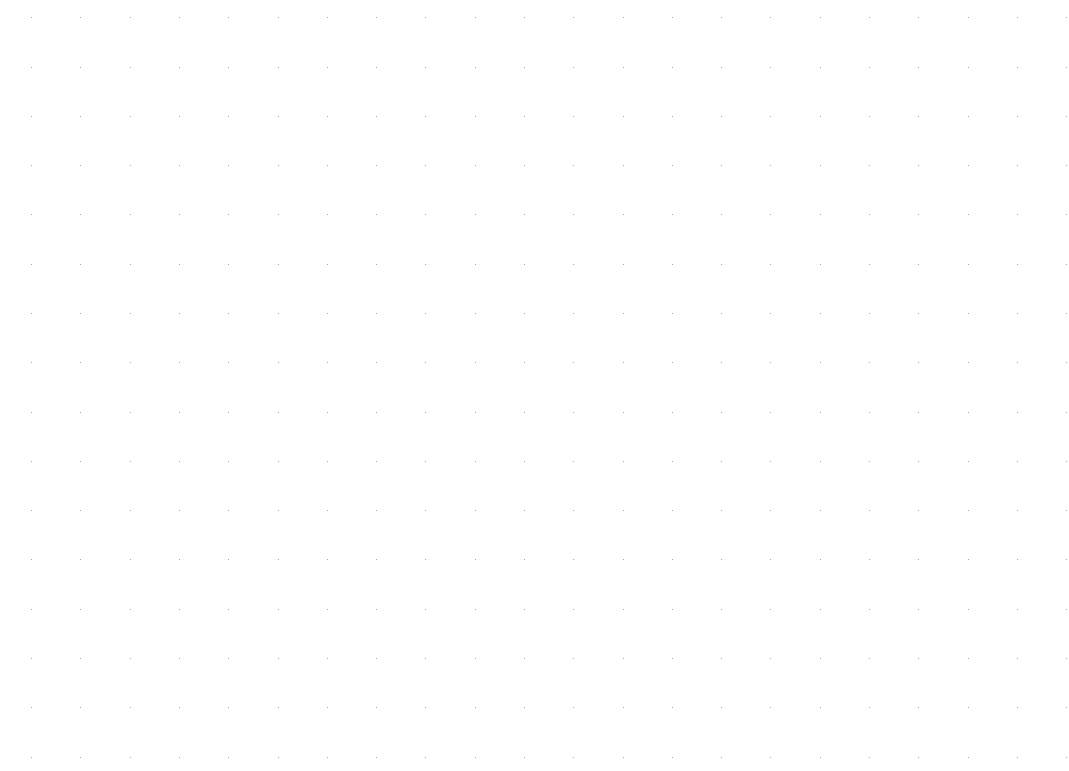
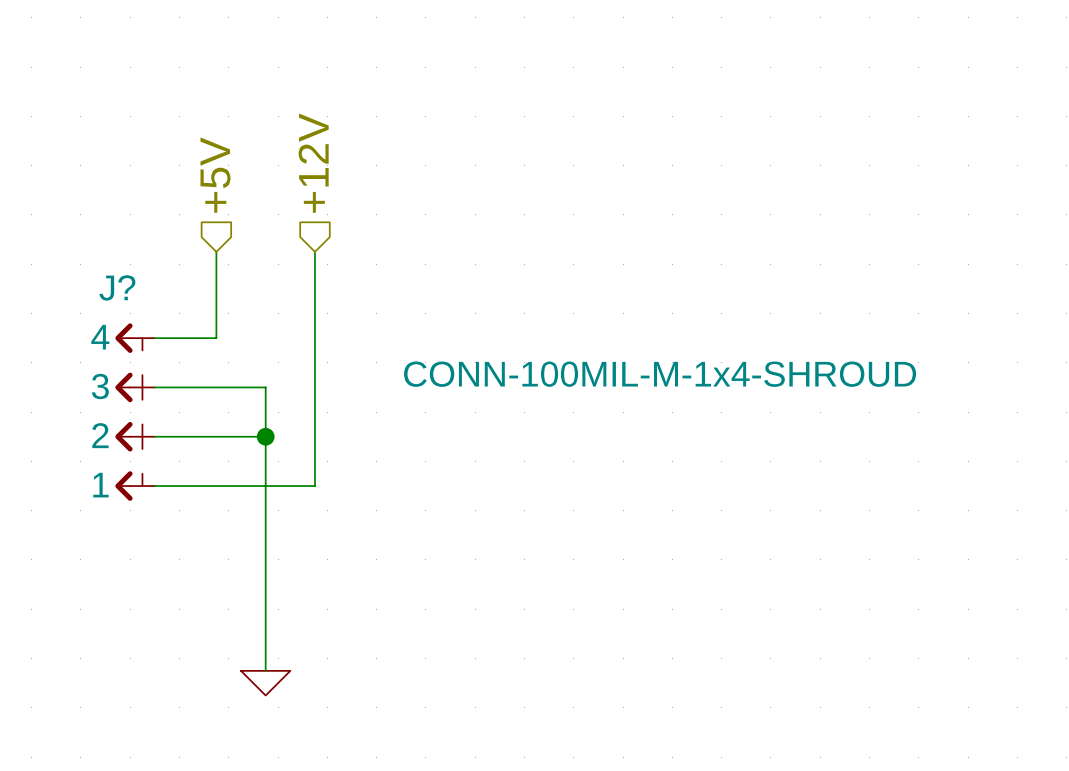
hierarchical label: none -> +12V (313, 163)
hierarchical label: none -> +5V (215, 175)
wire: none -> (216, 251) (216, 338) (154, 338)
wire: none -> (314, 251) (314, 486) (154, 486)
wire: none -> (154, 387) (265, 387) (265, 670)
J?: none -> CONN-100MIL-M-1x4-SHROUD (135, 412)
wire: none -> (154, 436) (265, 436)
junction: none -> (265, 436)
power symbol: none -> (265, 683)

